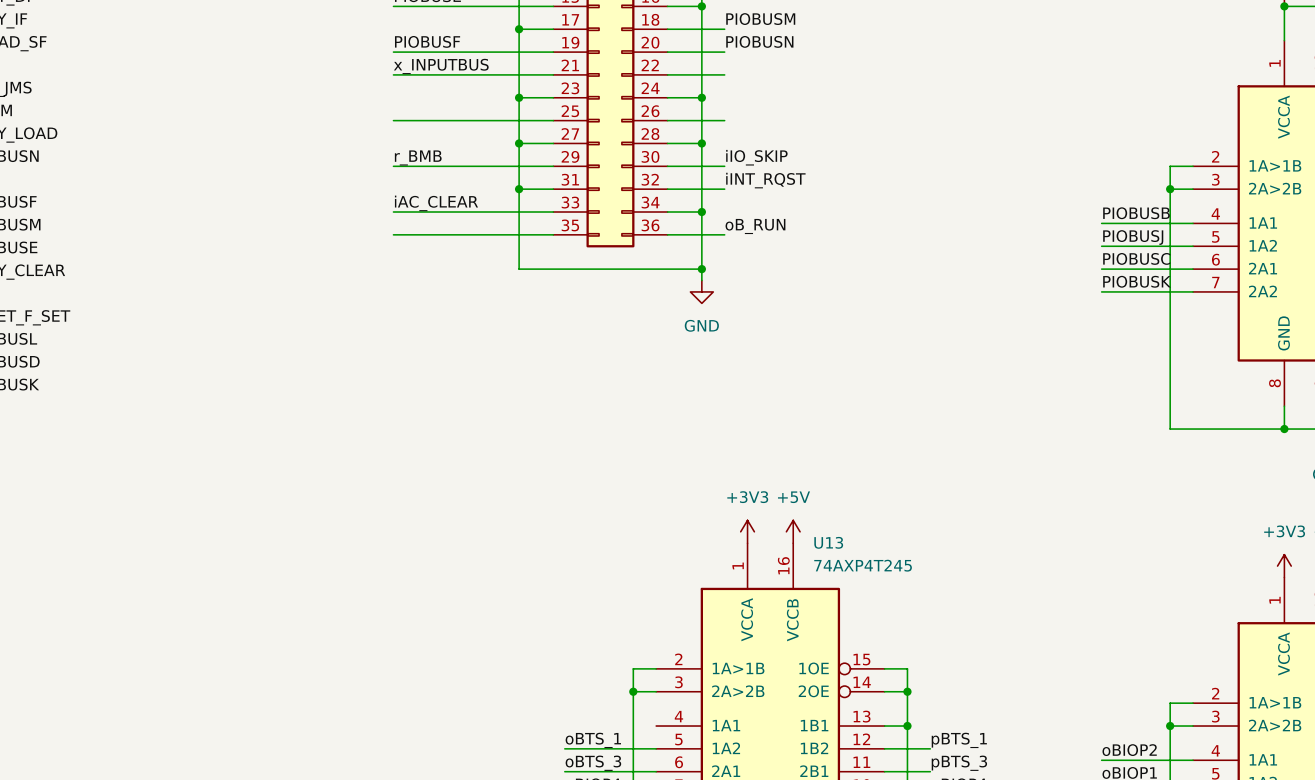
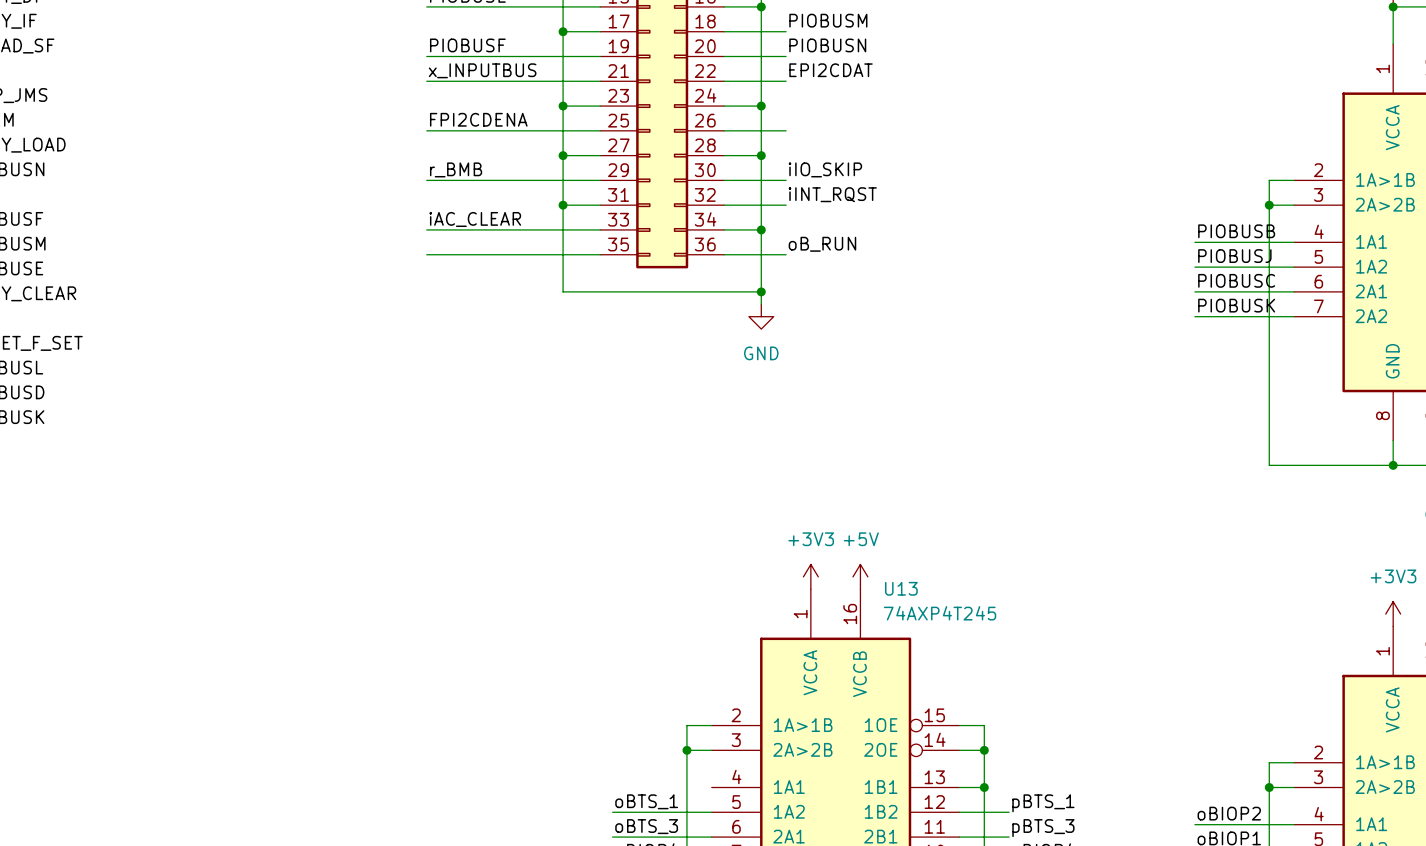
label: none -> EPI2CDAT (831, 70)
label: none -> FPI2CDENA (478, 119)

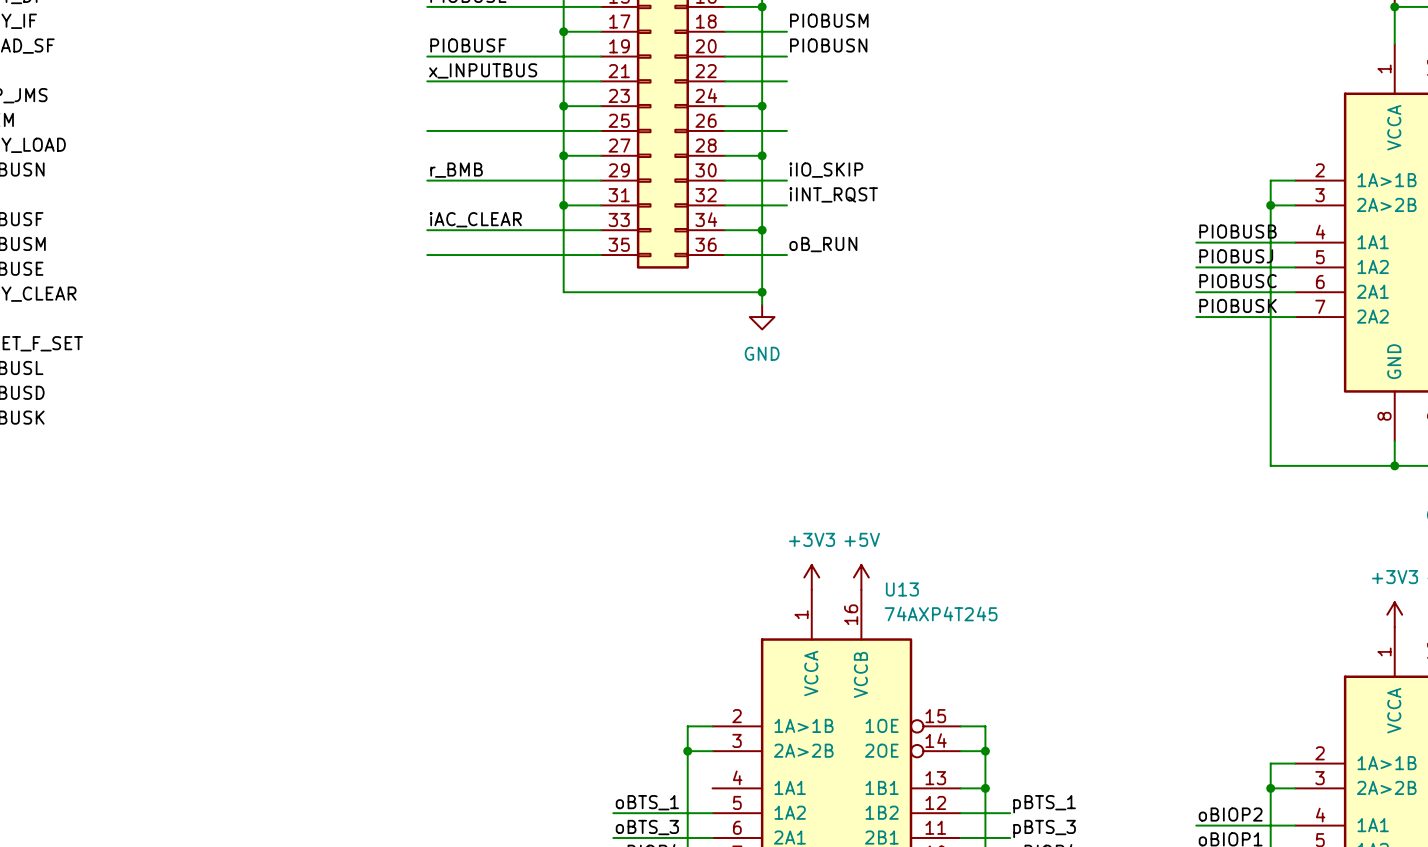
label: EPI2CDAT (831, 70) -> none
label: FPI2CDENA (478, 119) -> none

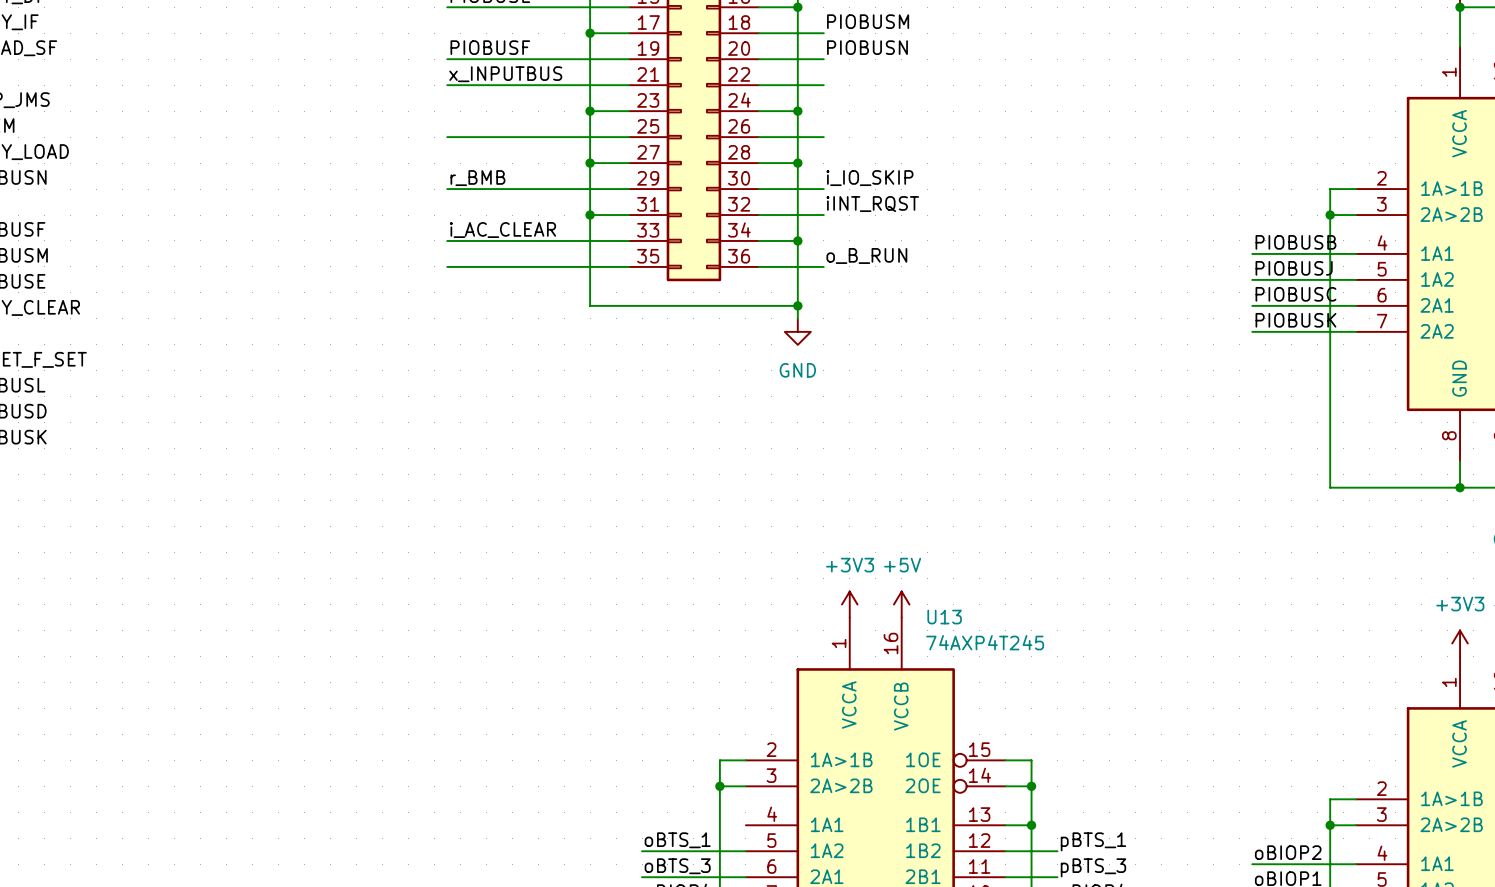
label: iIO_SKIP (826, 170) -> i_IO_SKIP (869, 178)
label: iAC_CLEAR (475, 219) -> i_AC_CLEAR (502, 230)
label: oB_RUN (823, 244) -> o_B_RUN (866, 255)

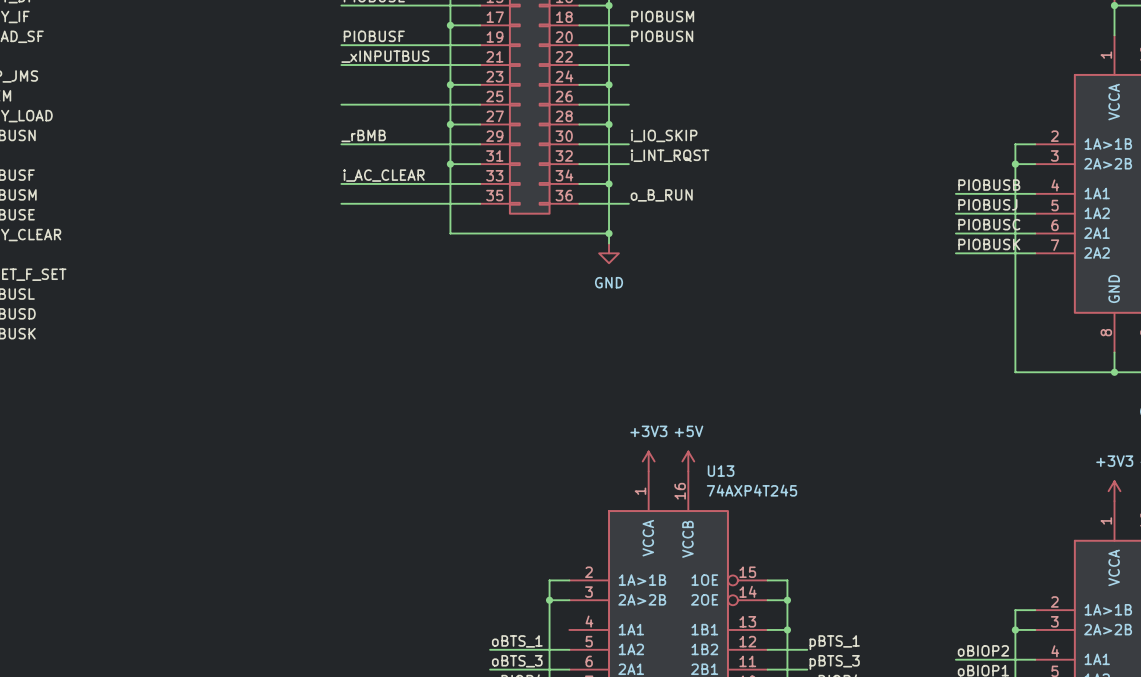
label: x_INPUTBUS (505, 74) -> _xINPUTBUS (385, 56)
label: r_BMB (477, 178) -> _rBMB (363, 135)
label: iINT_RQST (872, 204) -> i_INT_RQST (669, 155)

